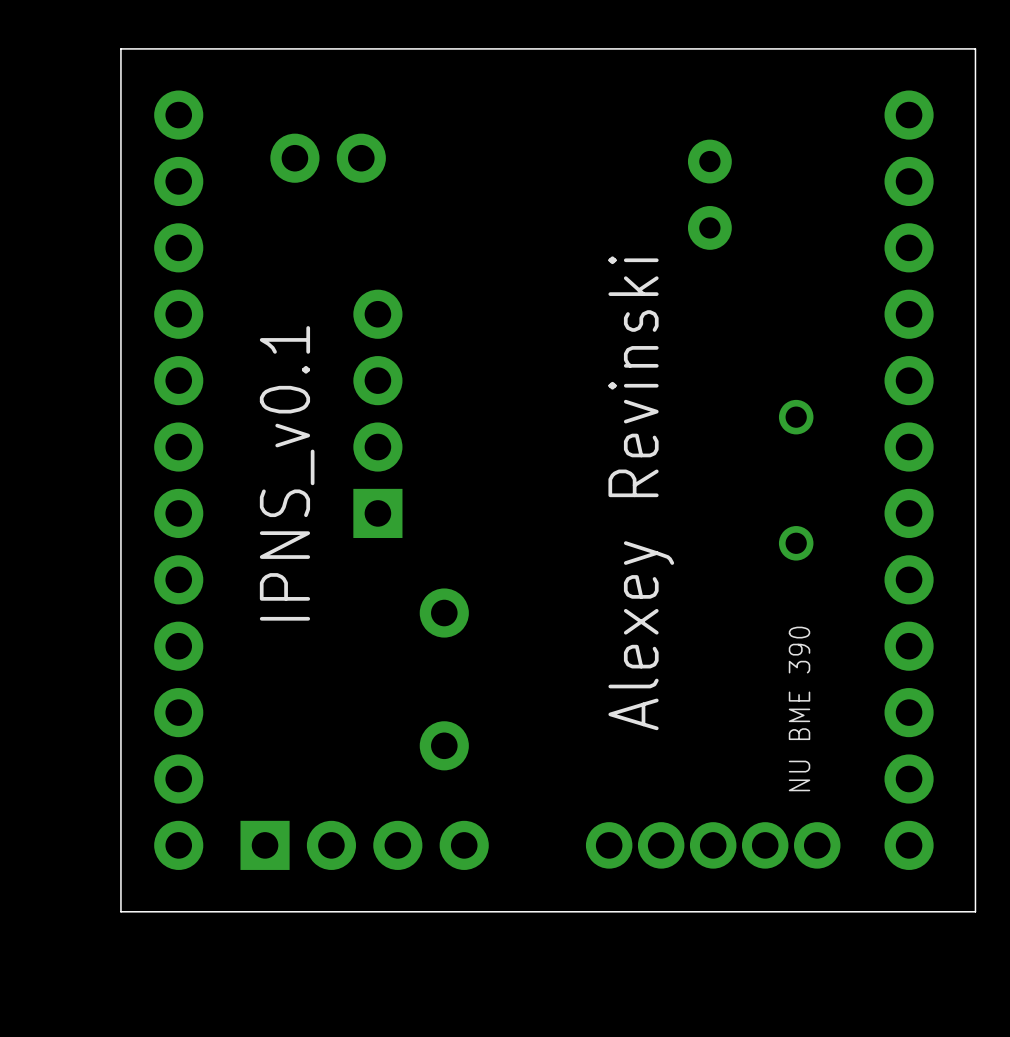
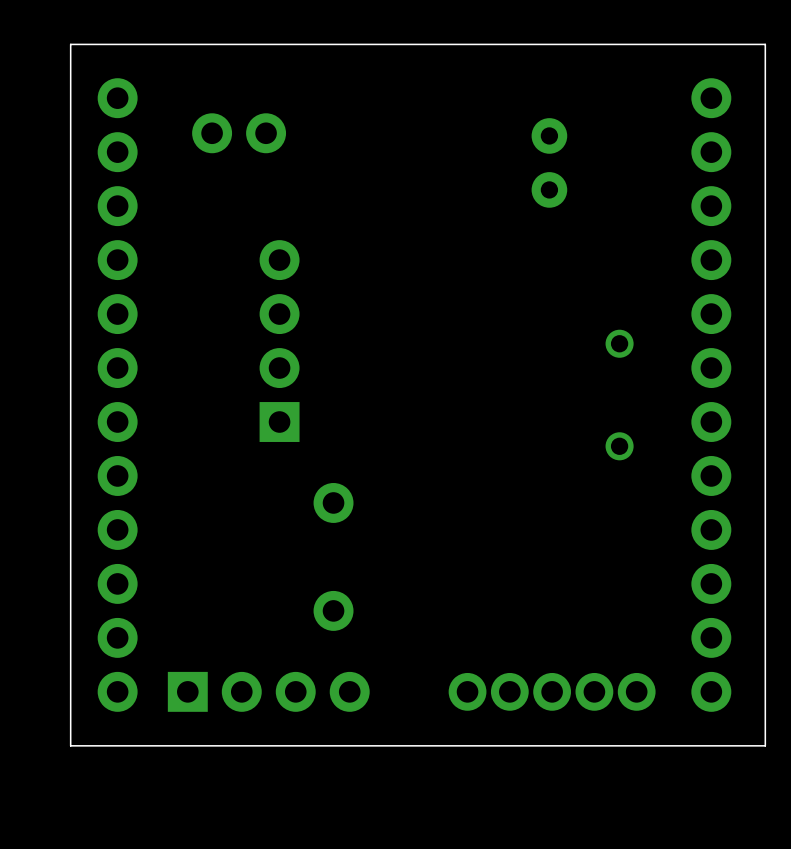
text: IPNS_v0.1 (287, 473) -> none
text: Alexey Revinski (641, 493) -> none
text: NU BME 390 (799, 708) -> none

